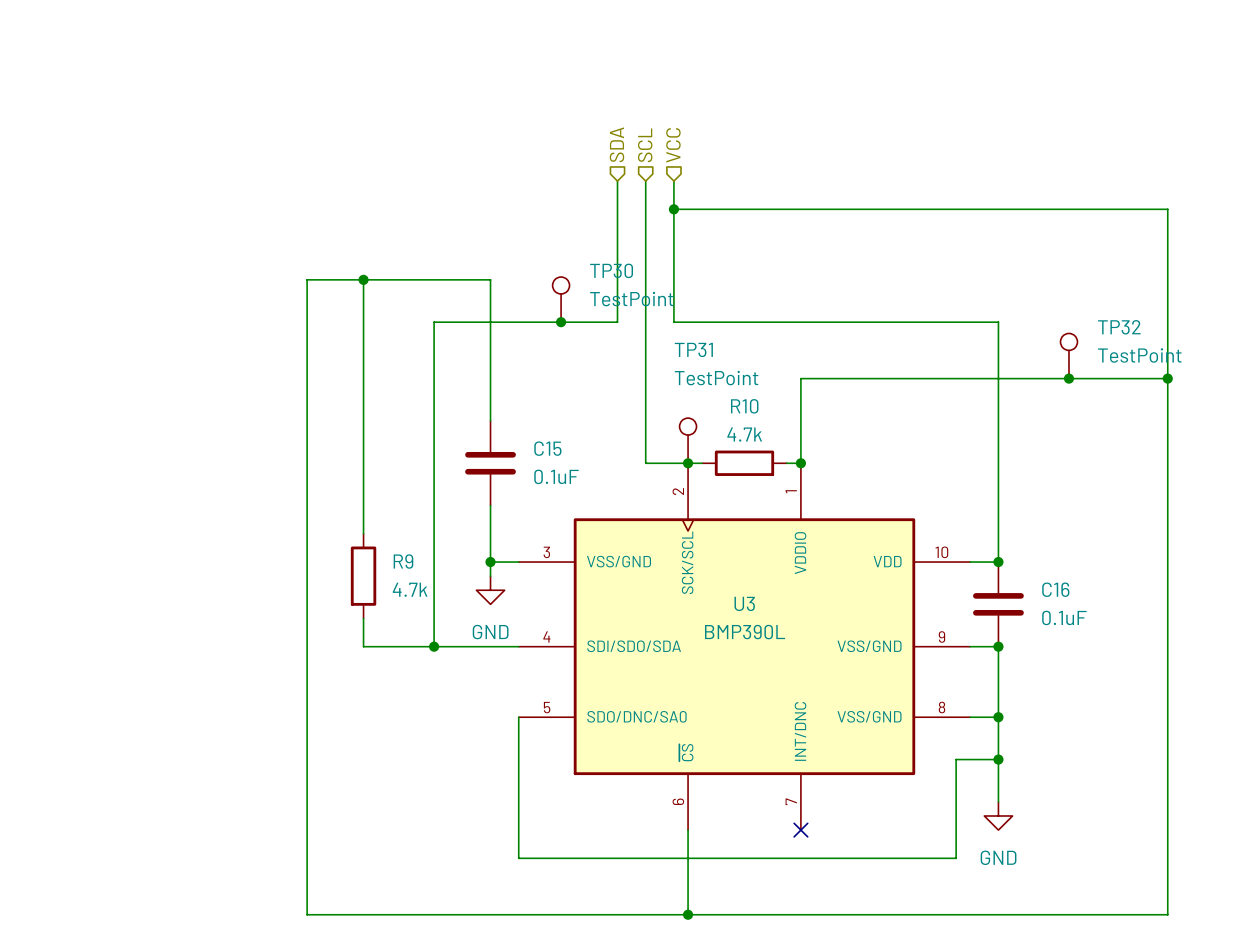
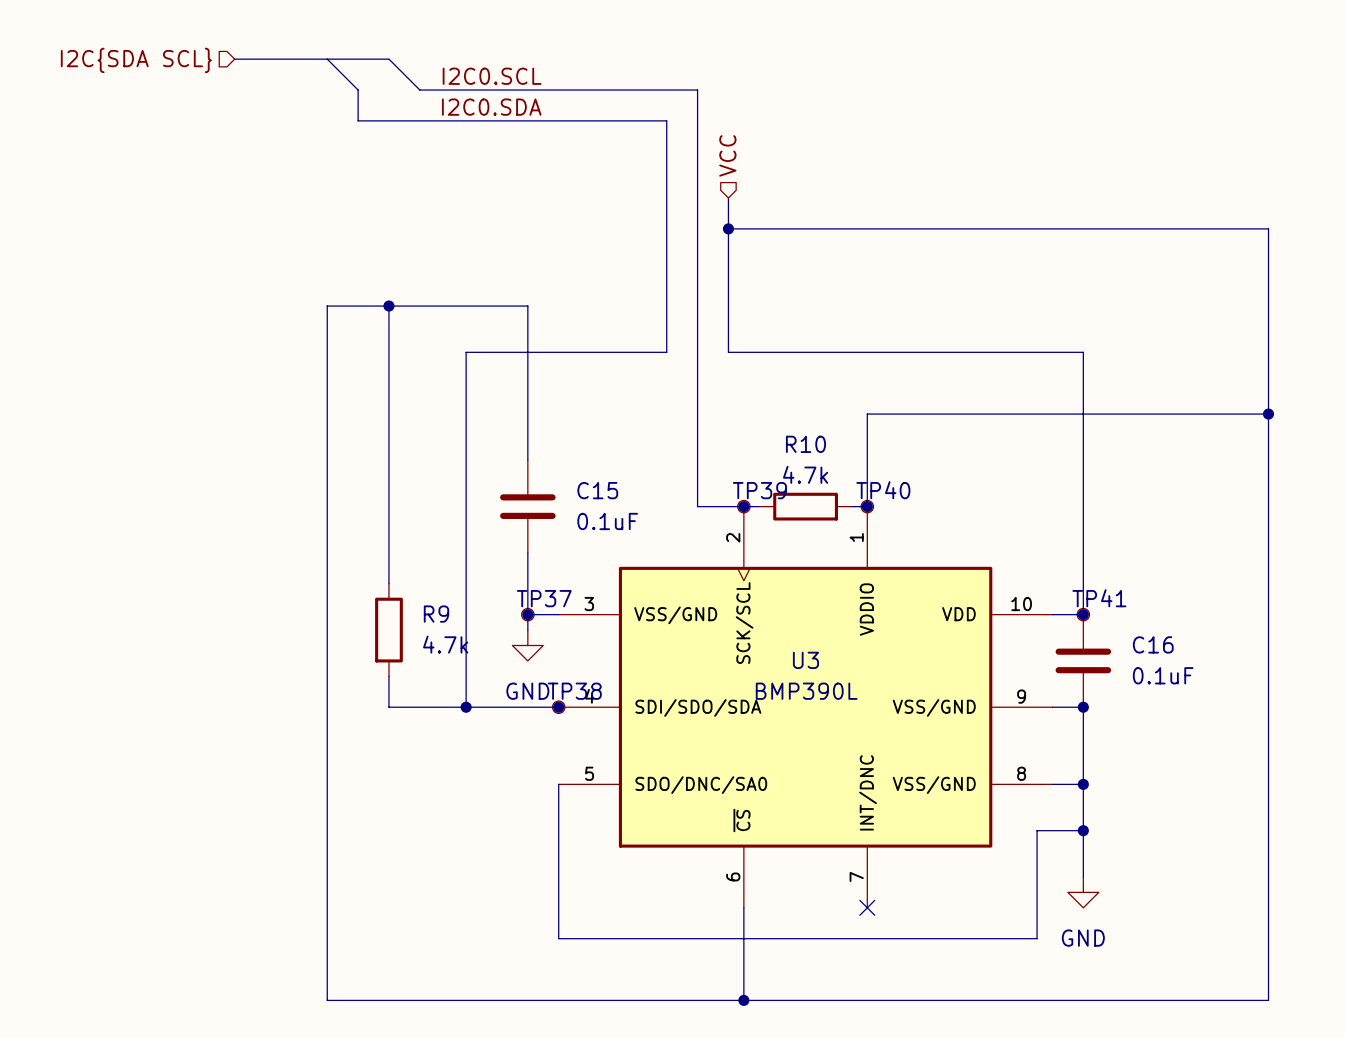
hierarchical label: none -> I2C{SDA SCL} (136, 60)
bus: none -> (234, 59) (388, 59)
wire: none -> (327, 59) (358, 90) (358, 120) (666, 120) (666, 198)
wire: none -> (388, 59) (419, 90) (697, 90) (697, 198)
label: none -> I2C0.SCL (492, 76)
label: none -> I2C0.SDA (491, 107)
hierarchical label: SDA (616, 144) -> none
hierarchical label: SCL (645, 145) -> none
TP30: TestPoint (561, 299) -> none
junction: (561, 322) -> none
TP32: TestPoint (1068, 356) -> none
junction: (1068, 378) -> none
TP31: TestPoint (688, 440) -> none
TP39: none -> (743, 506)
TP40: none -> (867, 506)
TP37: none -> (527, 614)
TP41: none -> (1083, 614)
junction: none -> (558, 707)
TP38: none -> (558, 707)

